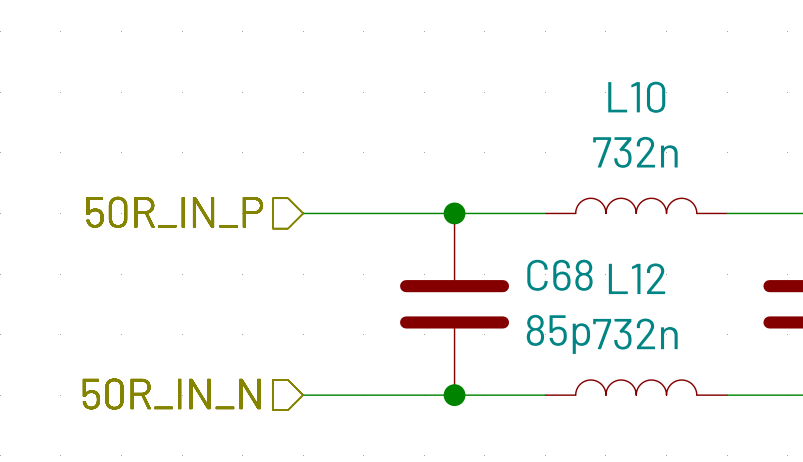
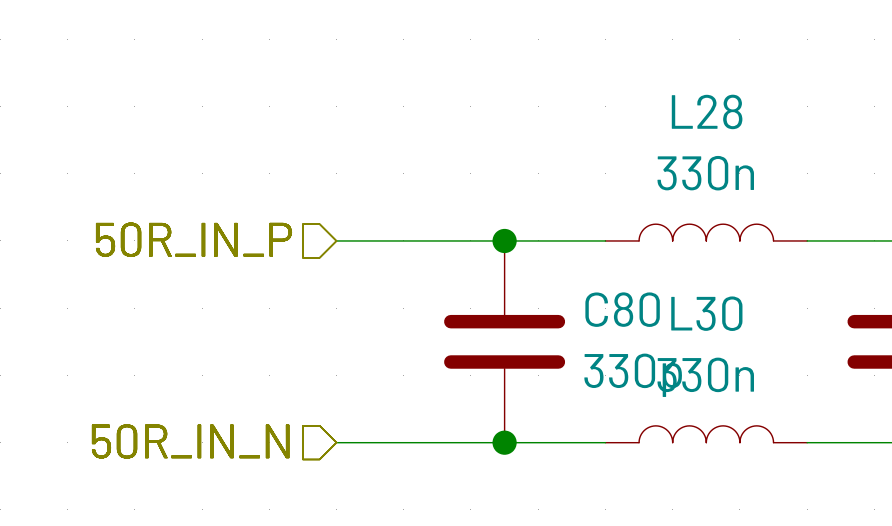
L10 name: L10 (636, 97) -> L28 (707, 111)
L10 value: 732n (635, 152) -> 330n (705, 173)
C68 name: C68 (559, 275) -> C80 (622, 309)
L12 name: L12 (637, 278) -> L30 (706, 313)
C68 value: 85p (558, 334) -> 330p (633, 375)
L12 value: 732n (635, 334) -> 330n (705, 374)

